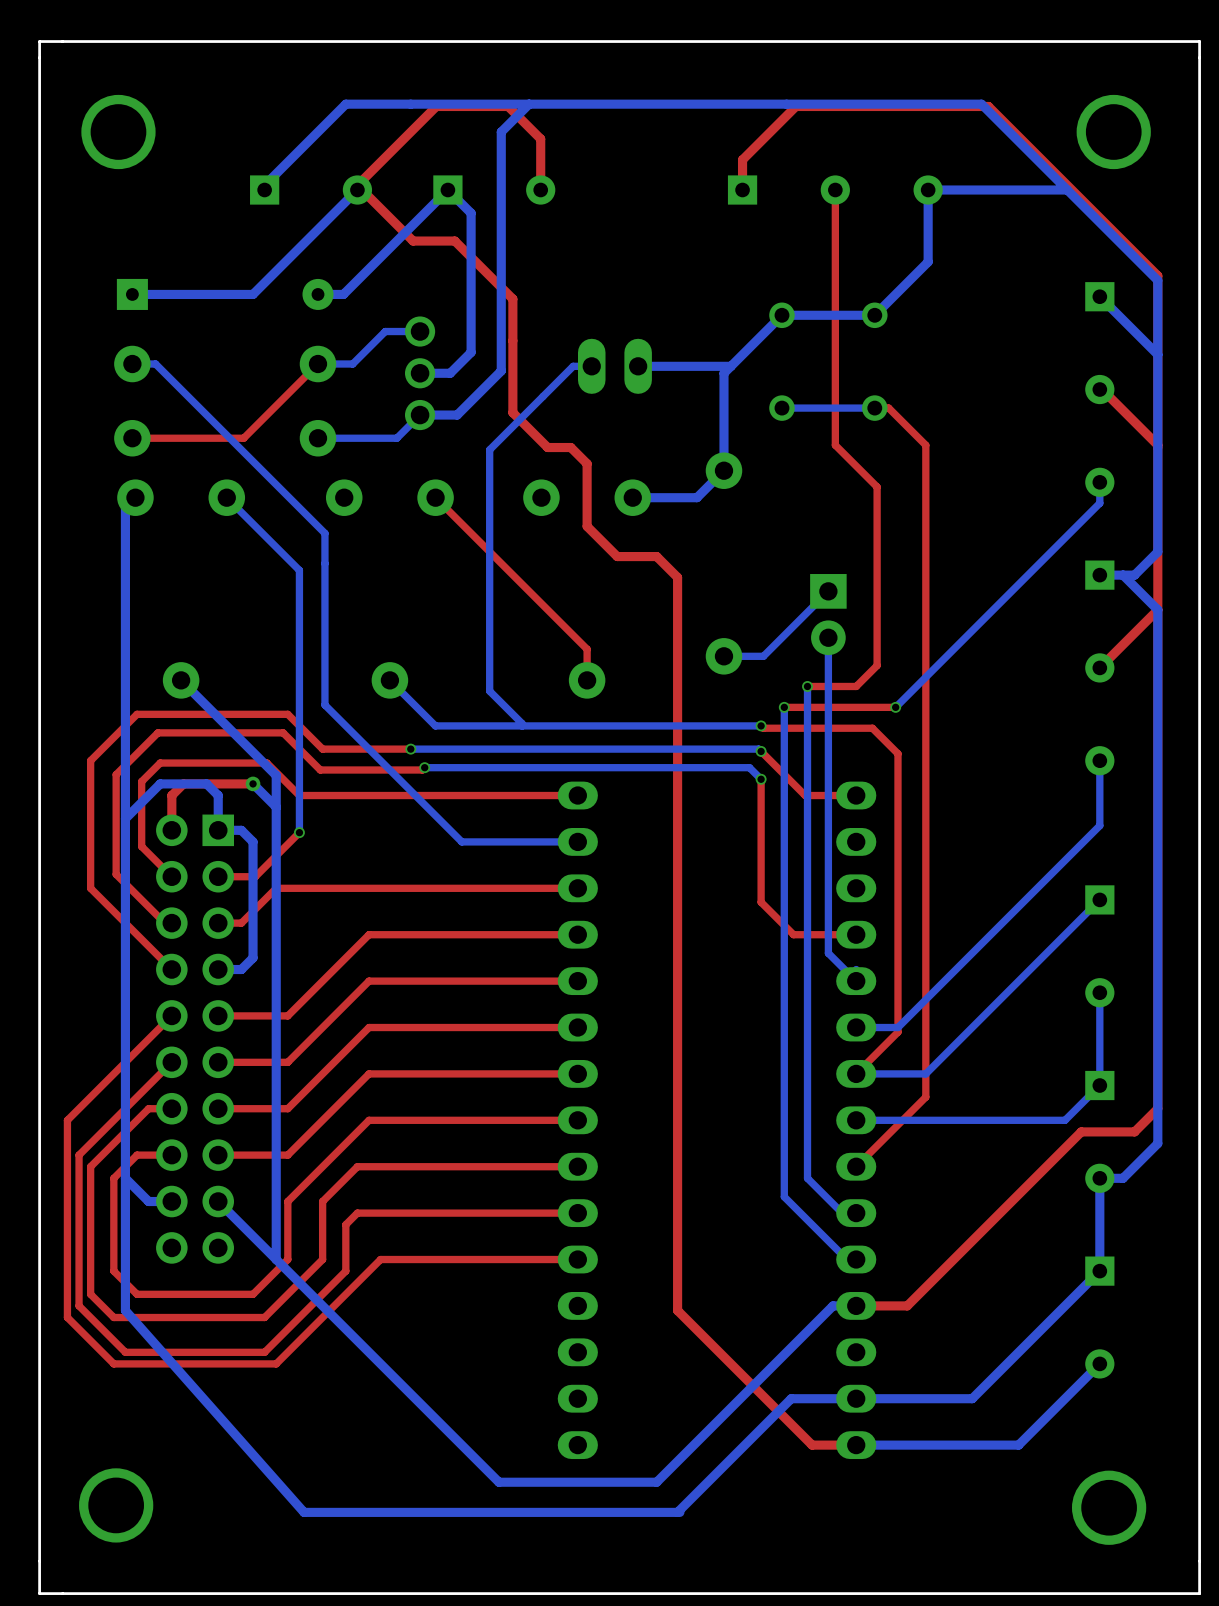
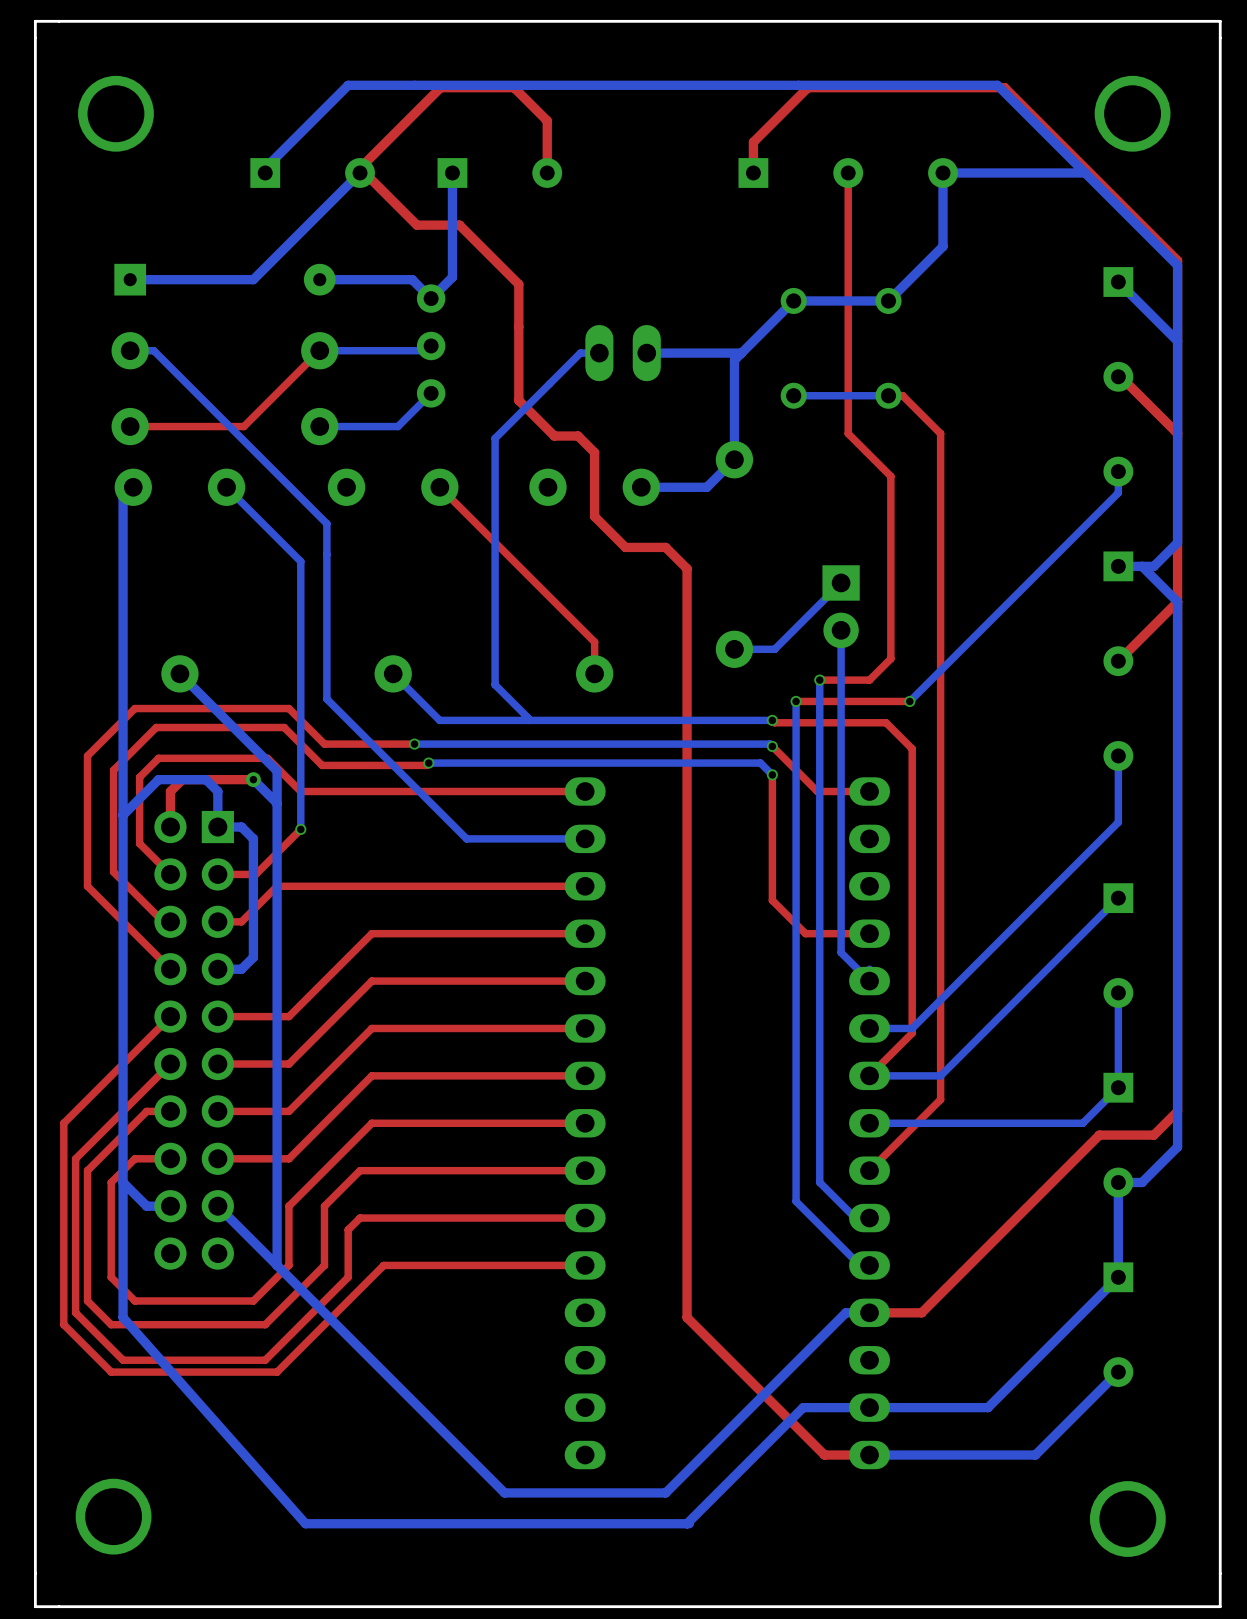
bottom track: (529, 104) (501, 132) (501, 370) (457, 415) (420, 415) (396, 438) (394, 438) -> (431, 393) (397, 426)
bottom track: (343, 294) (447, 190) (471, 213) (471, 352) (450, 373) (420, 373) -> (345, 279) (412, 279) (431, 298) (452, 277) (452, 168)
part footprint: [404, 316, 436, 431] -> [416, 284, 446, 408]
bottom track: (420, 331) (385, 331) (352, 364) -> (431, 345) (426, 350) (355, 350)

